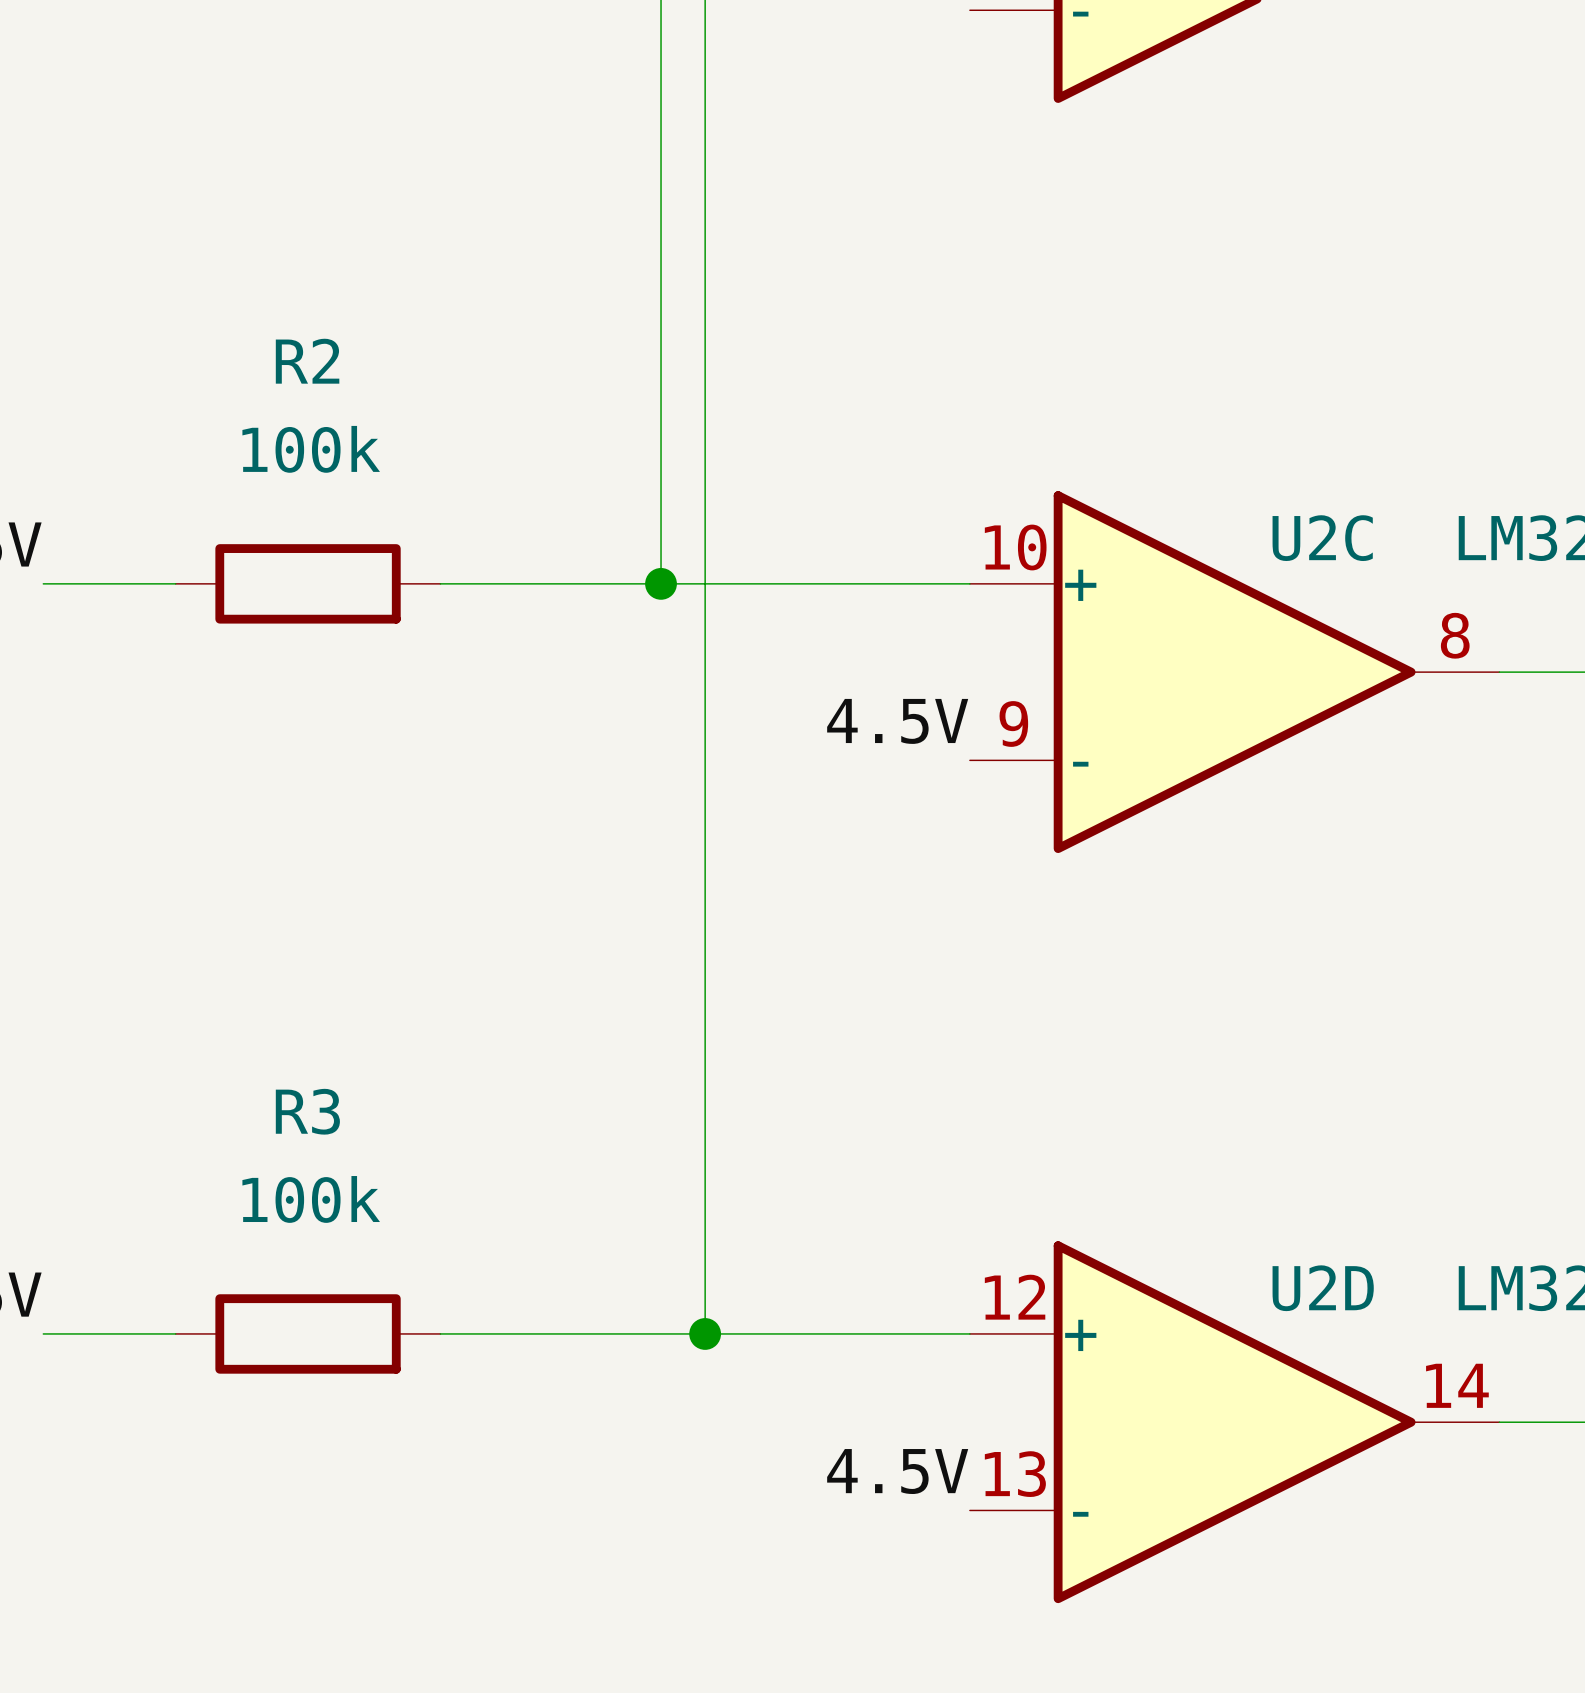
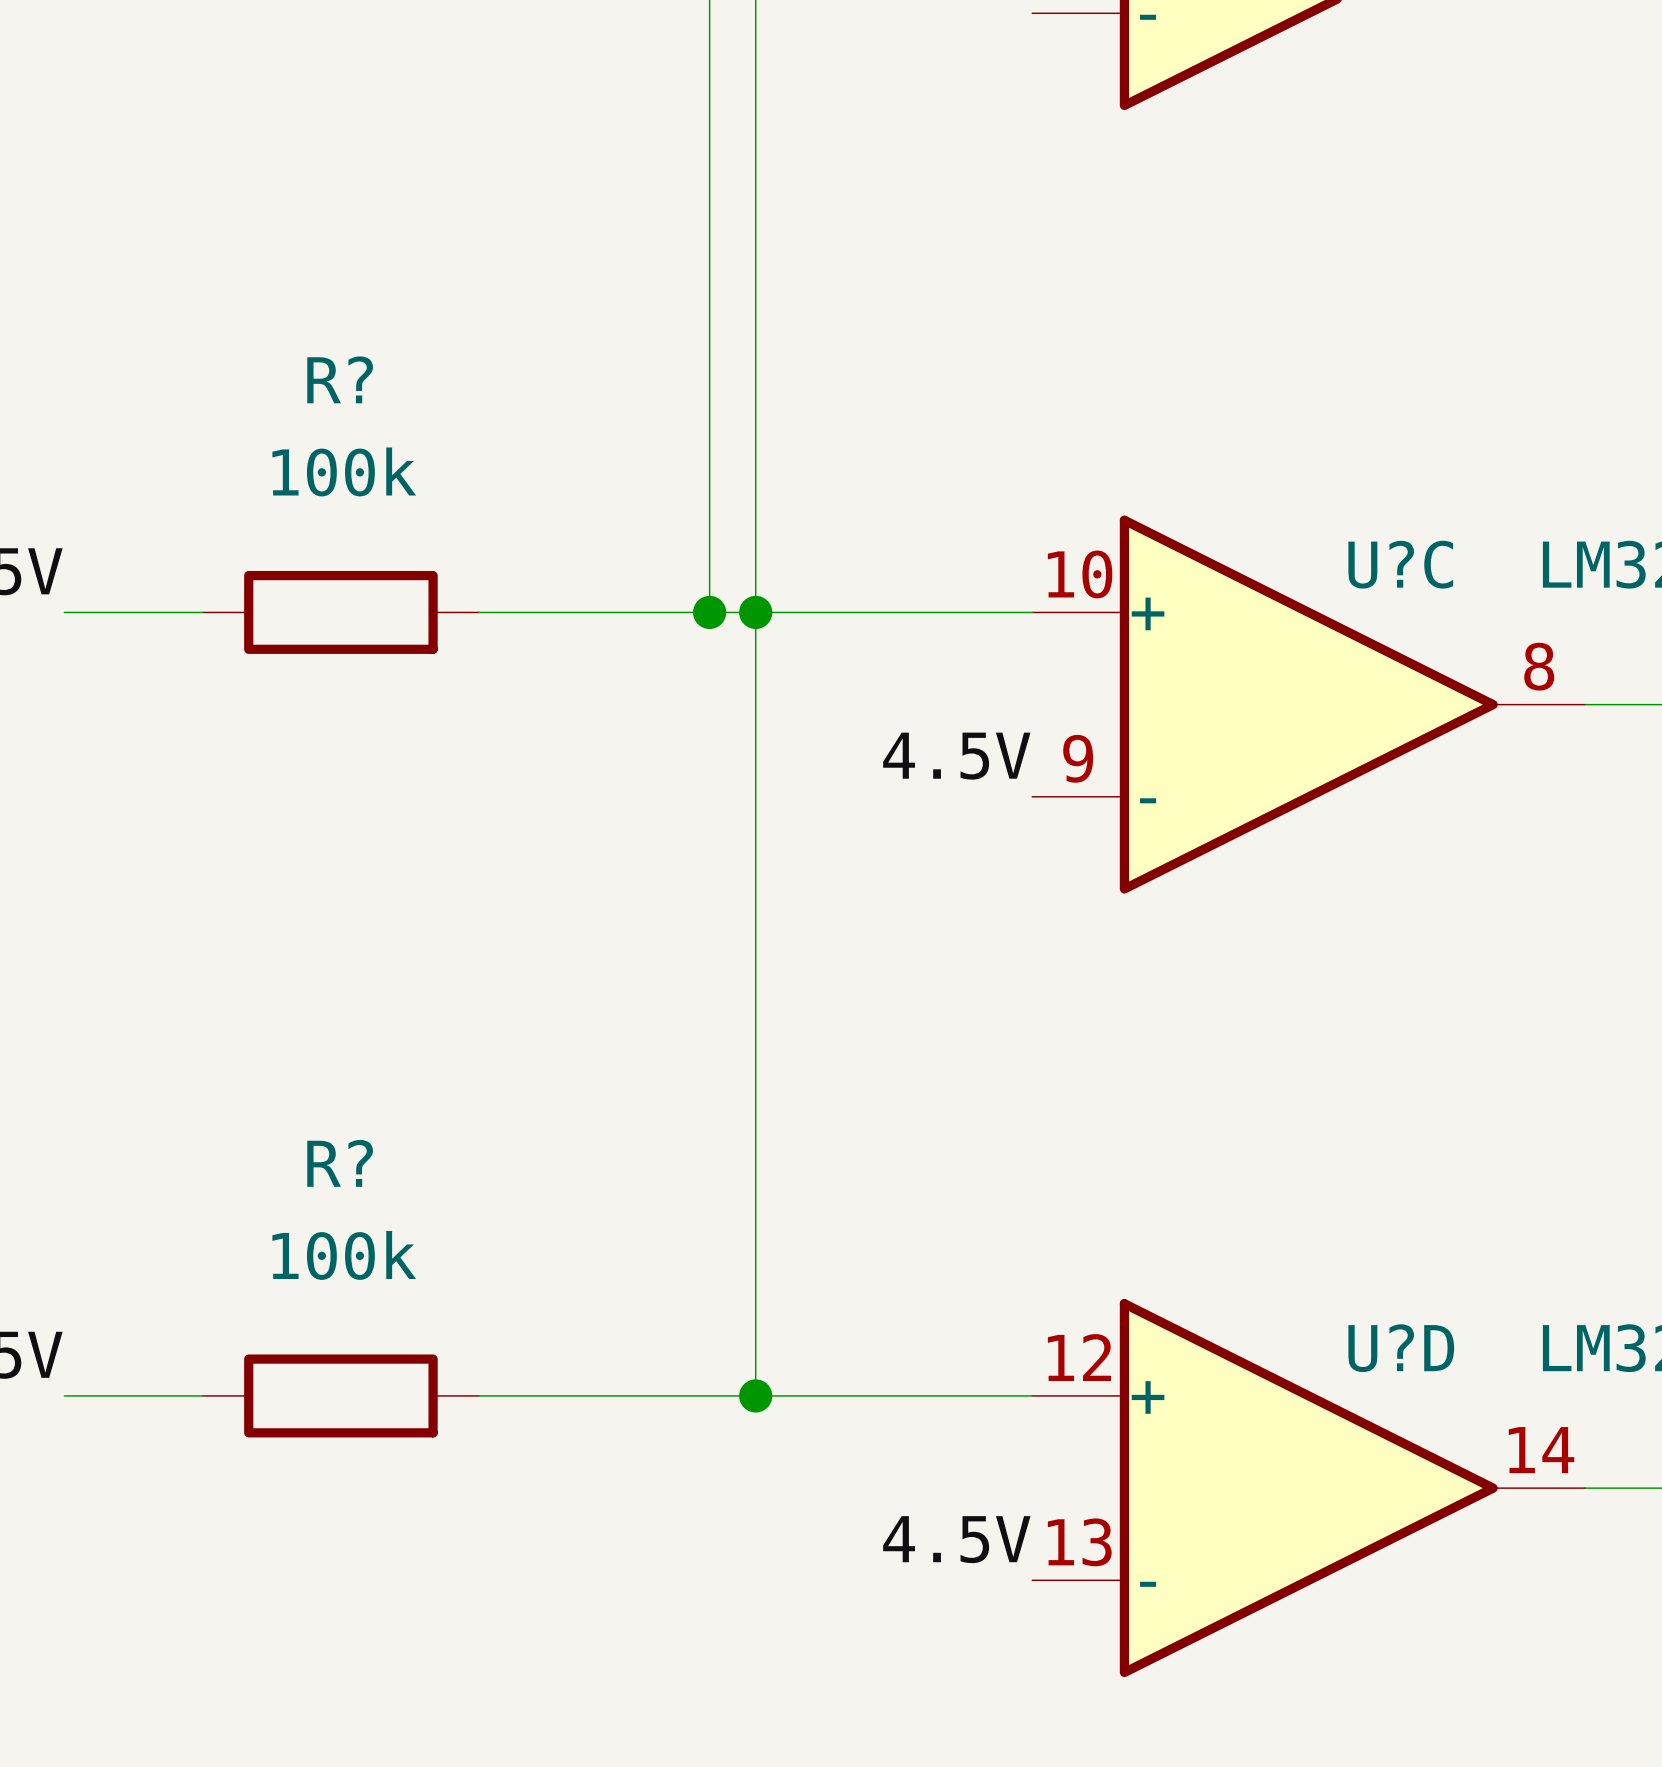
R2 name: R2 (307, 361) -> R? (340, 379)
U2C name: U2C (1322, 538) -> U?C (1400, 564)
junction: none -> (755, 612)
R3 name: R3 (307, 1111) -> R? (340, 1163)
U2D name: U2D (1323, 1288) -> U?D (1401, 1348)

